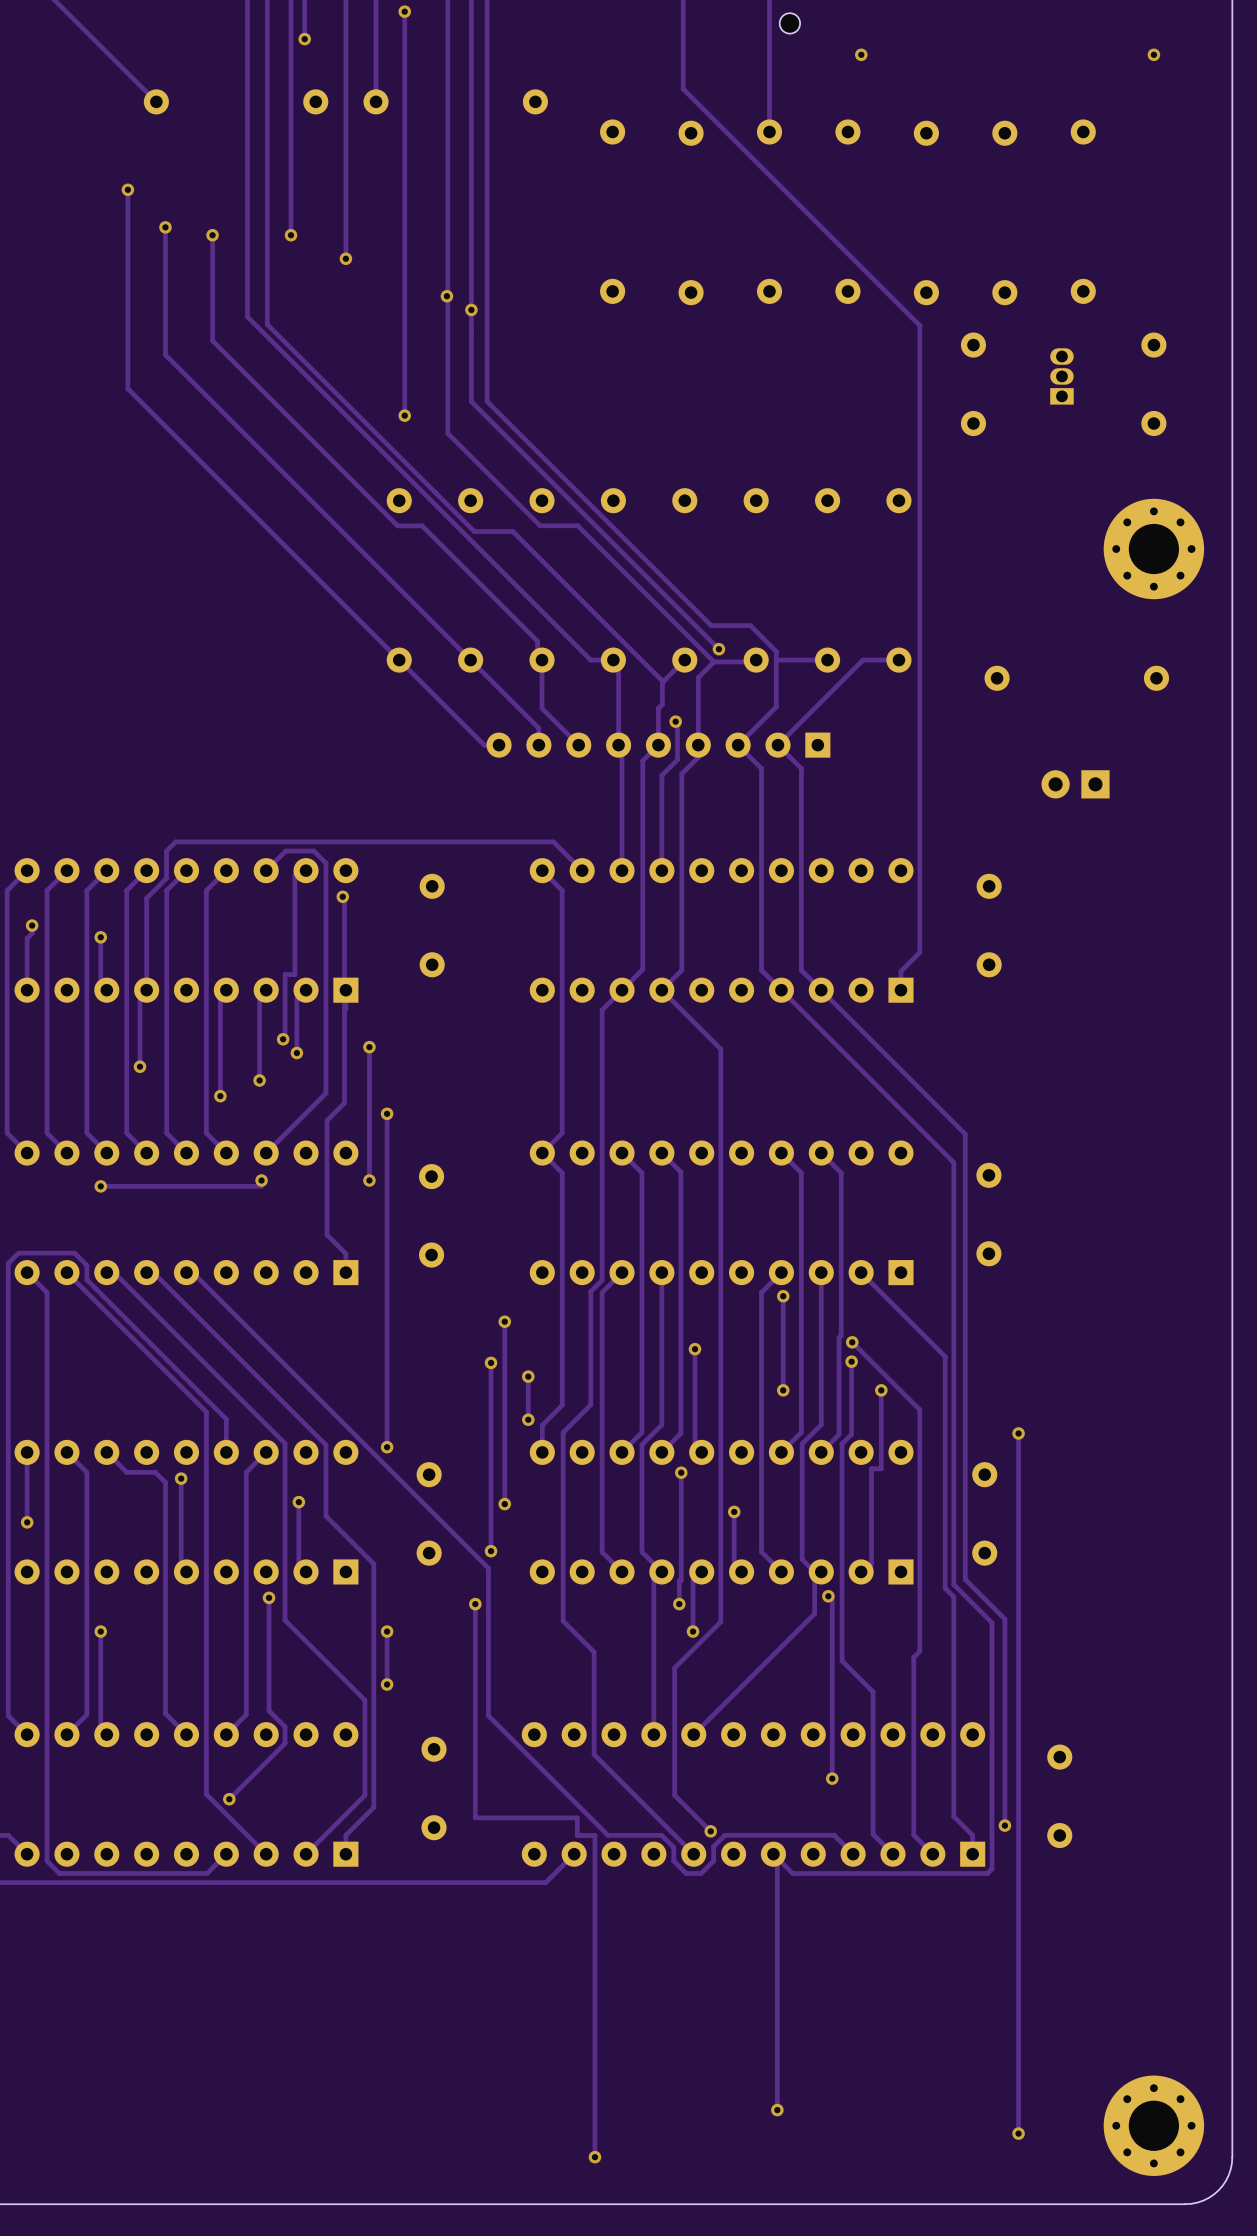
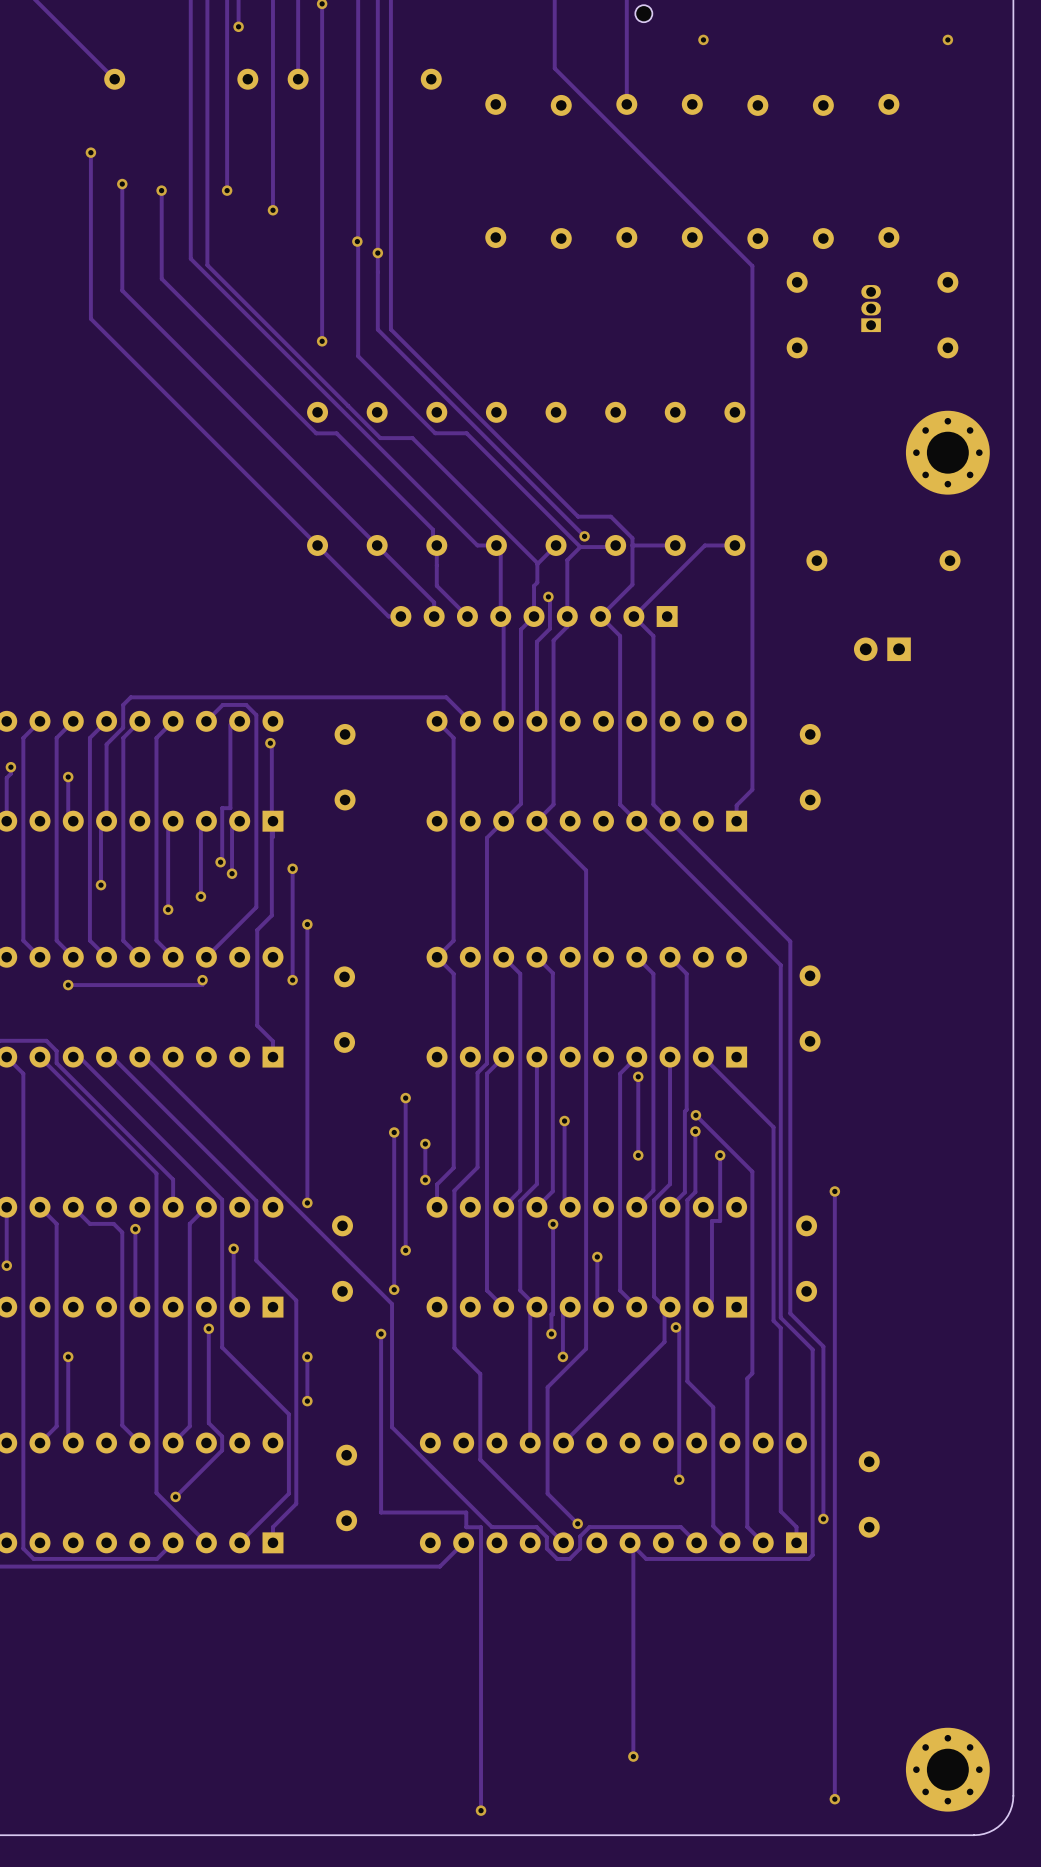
track: none -> (834, 1776) (834, 1799)
via position: (1018, 2133) -> (834, 1799)
track: none -> (481, 1795) (481, 1810)
via position: (594, 2157) -> (481, 1810)

